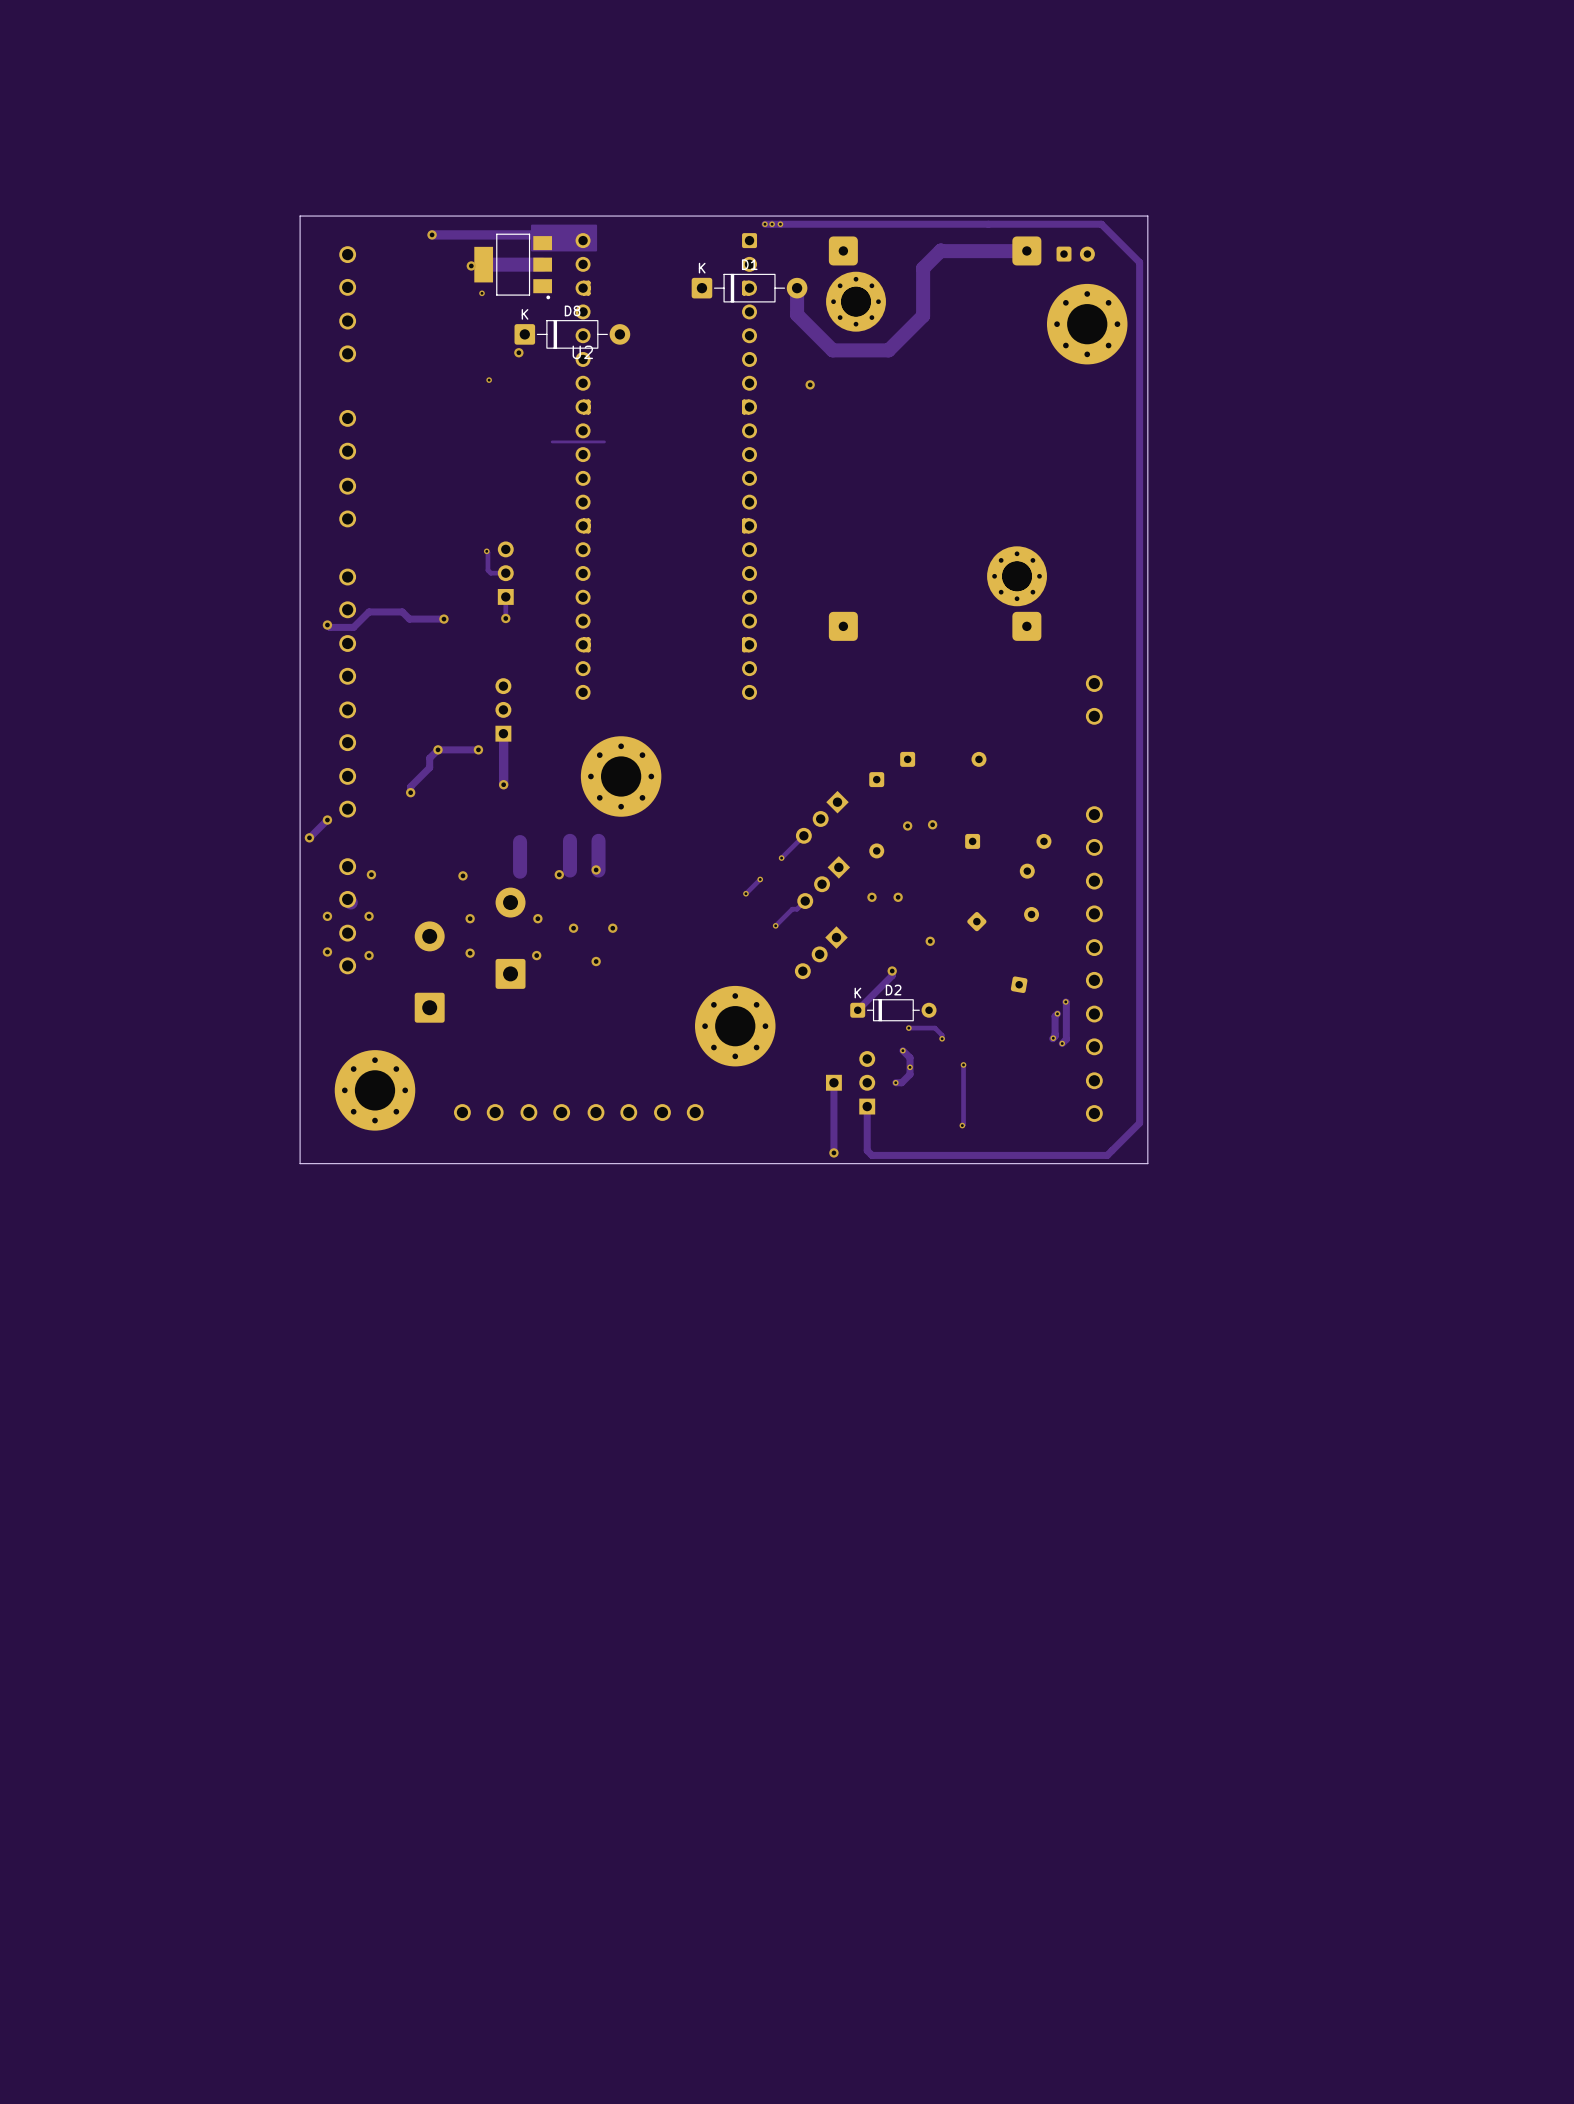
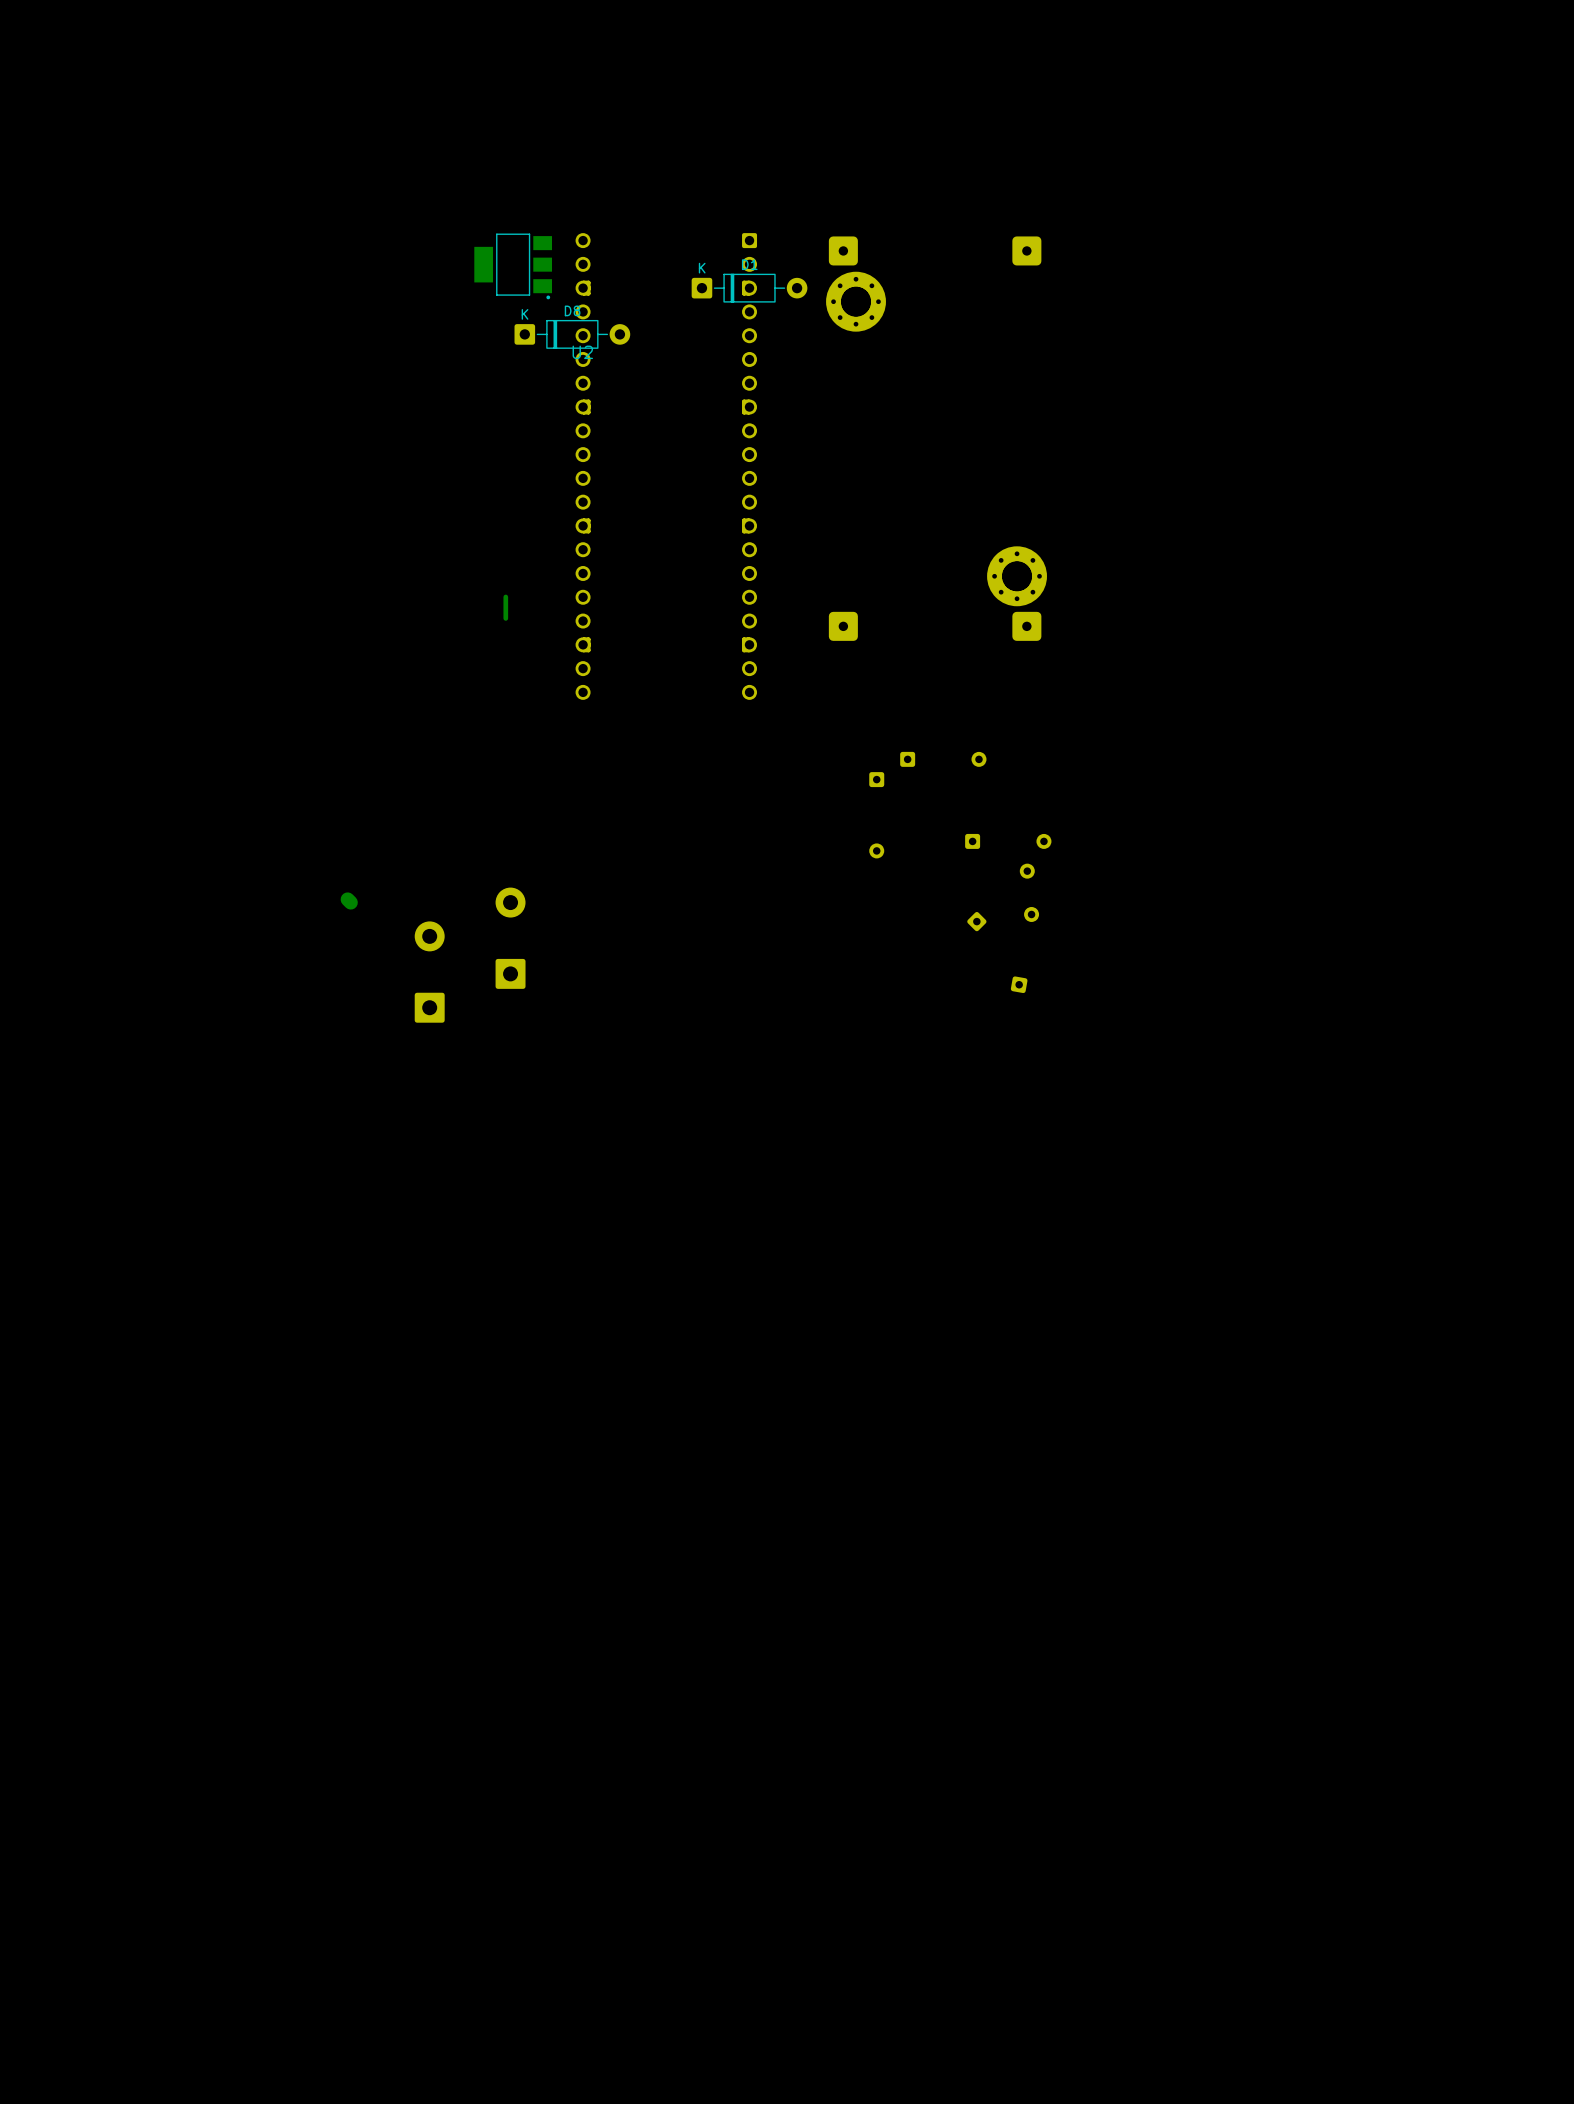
board edge: (1147, 216) (300, 216) (300, 1163) (1147, 1163) (1147, 216) -> none
drawing: [531, 224, 598, 252] -> none
track: (764, 224) (1101, 224) (1139, 262) (1139, 1123) (1107, 1155) (871, 1155) (867, 1150) (867, 1106) -> none
via: (764, 224) -> none
via: (772, 224) -> none
via: (780, 224) -> none
track: (432, 234) (534, 234) (542, 243) -> none
via: (432, 234) -> none
track: (1032, 251) (940, 250) (923, 268) (923, 315) (888, 350) (832, 350) (797, 314) (797, 288) -> none
part: (1075, 254) -> none
track: (542, 264) (486, 264) -> none
via: (471, 265) -> none
part: (347, 270) -> none
via: (482, 293) -> none
part: (1087, 324) -> none
part: (347, 337) -> none
via: (518, 352) -> none
via: (489, 380) -> none
via: (810, 384) -> none
part: (347, 434) -> none
track: (604, 441) (552, 441) -> none
part: (347, 502) -> none
track: (486, 551) (487, 570) (490, 573) (505, 573) -> none
via: (486, 551) -> none
part: (505, 573) -> none
part: (347, 593) -> none
via: (505, 618) -> none
track: (443, 619) (409, 619) (402, 611) (369, 611) (353, 627) (329, 627) (327, 625) -> none
via: (443, 619) -> none
via: (327, 625) -> none
part: (347, 659) -> none
part: (1094, 699) -> none
part: (503, 709) -> none
part: (347, 726) -> none
track: (503, 733) (503, 784) -> none
via: (438, 749) -> none
track: (478, 749) (438, 749) (429, 758) (429, 767) (410, 786) (410, 792) -> none
via: (478, 749) -> none
part: (621, 776) -> none
via: (503, 784) -> none
part: (347, 792) -> none
via: (410, 792) -> none
part: (822, 817) -> none
track: (327, 820) (308, 837) -> none
via: (327, 820) -> none
via: (932, 824) -> none
via: (907, 825) -> none
part: (1094, 831) -> none
track: (803, 835) (781, 858) -> none
via: (309, 837) -> none
track: (569, 840) (569, 870) -> none
track: (598, 840) (598, 870) -> none
track: (520, 842) (520, 871) -> none
via: (781, 858) -> none
via: (596, 869) -> none
via: (371, 874) -> none
via: (559, 874) -> none
via: (462, 875) -> none
track: (760, 879) (745, 893) -> none
via: (760, 879) -> none
part: (823, 882) -> none
part: (347, 883) -> none
via: (745, 893) -> none
via: (871, 897) -> none
via: (898, 897) -> none
part: (1094, 897) -> none
track: (805, 901) (797, 909) (792, 909) (775, 925) -> none
via: (327, 916) -> none
via: (369, 916) -> none
via: (470, 918) -> none
via: (537, 918) -> none
via: (775, 925) -> none
via: (573, 928) -> none
via: (612, 928) -> none
via: (930, 941) -> none
part: (347, 949) -> none
via: (327, 951) -> none
part: (821, 952) -> none
via: (470, 953) -> none
via: (369, 955) -> none
via: (536, 955) -> none
via: (596, 961) -> none
part: (1094, 963) -> none
track: (892, 971) (892, 975) (857, 1010) -> none
via: (892, 971) -> none
track: (1065, 1001) (1066, 1039) (1062, 1043) -> none
via: (1065, 1001) -> none
D2: (893, 1010) -> none
track: (1057, 1013) (1055, 1016) (1055, 1036) (1052, 1038) -> none
via: (1057, 1013) -> none
part: (735, 1026) -> none
track: (908, 1028) (935, 1028) (942, 1035) (942, 1038) -> none
via: (908, 1028) -> none
part: (1094, 1030) -> none
via: (942, 1038) -> none
via: (1053, 1038) -> none
via: (1062, 1043) -> none
track: (902, 1050) (910, 1057) (910, 1074) (901, 1082) (895, 1082) -> none
via: (902, 1050) -> none
track: (963, 1064) (962, 1125) -> none
via: (963, 1064) -> none
via: (910, 1067) -> none
track: (833, 1082) (833, 1152) -> none
part: (833, 1082) -> none
part: (867, 1082) -> none
via: (895, 1082) -> none
part: (375, 1090) -> none
part: (1094, 1097) -> none
part: (478, 1112) -> none
part: (545, 1112) -> none
part: (612, 1112) -> none
part: (678, 1112) -> none
via: (962, 1125) -> none
via: (833, 1152) -> none

